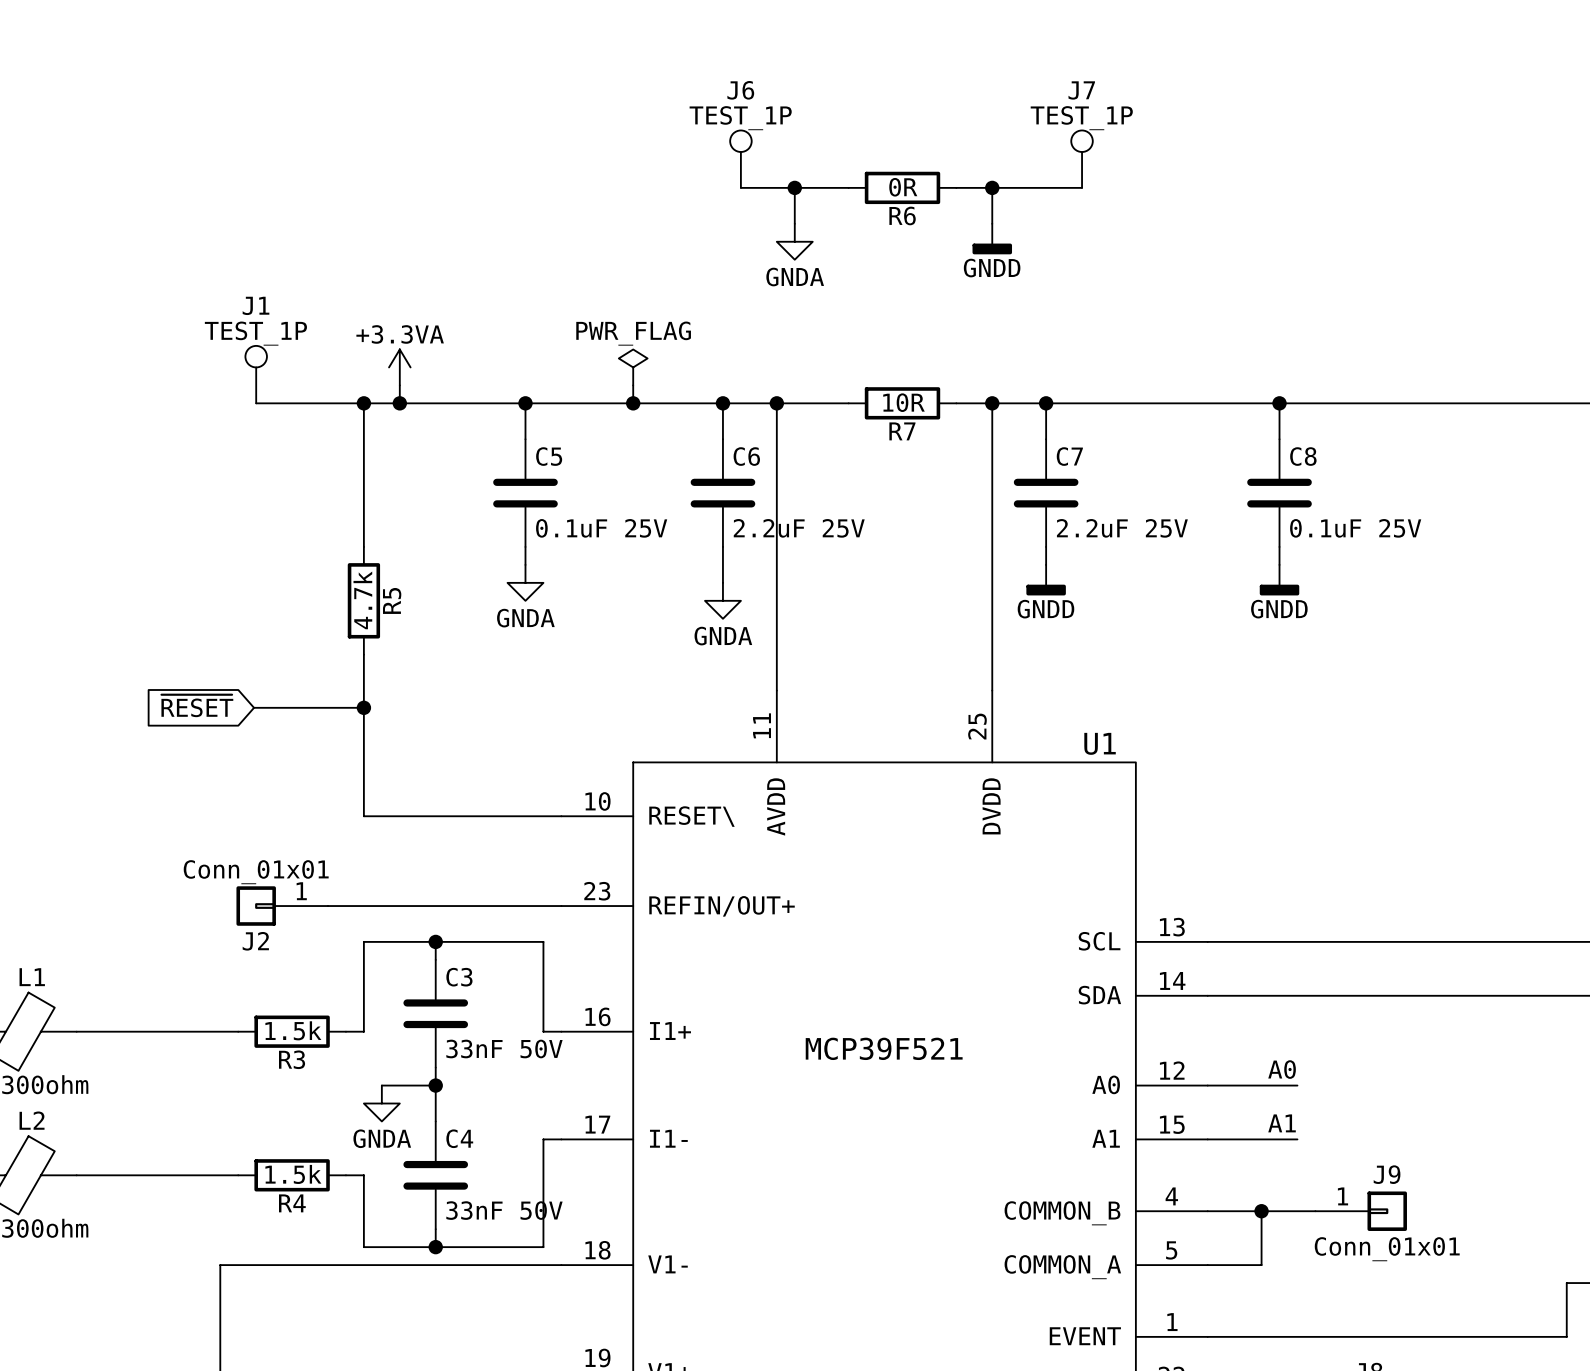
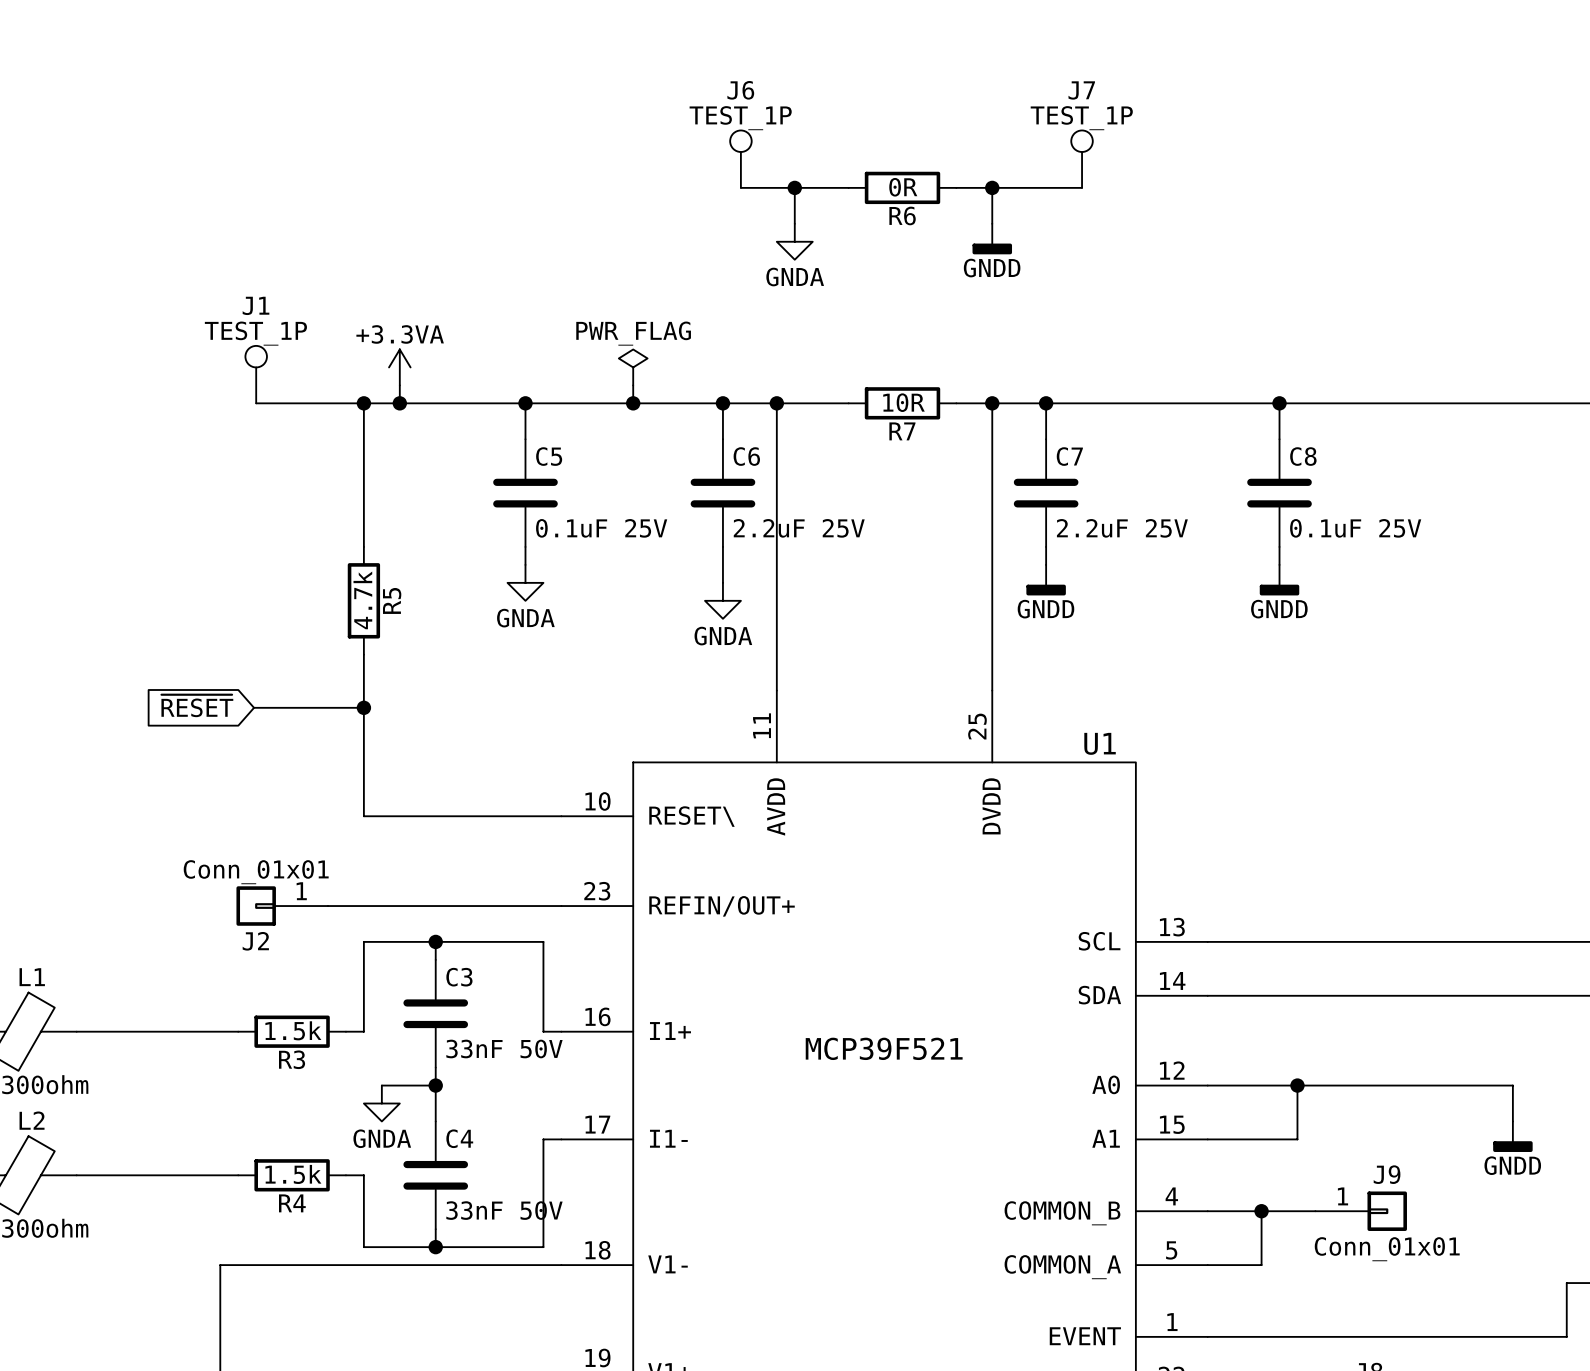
label: A0 (1282, 1069) -> none
junction: none -> (1297, 1085)
wire: none -> (1512, 1121) (1512, 1085) (1297, 1085) (1297, 1139)
label: A1 (1282, 1123) -> none
power symbol: none -> GNDD (1512, 1136)

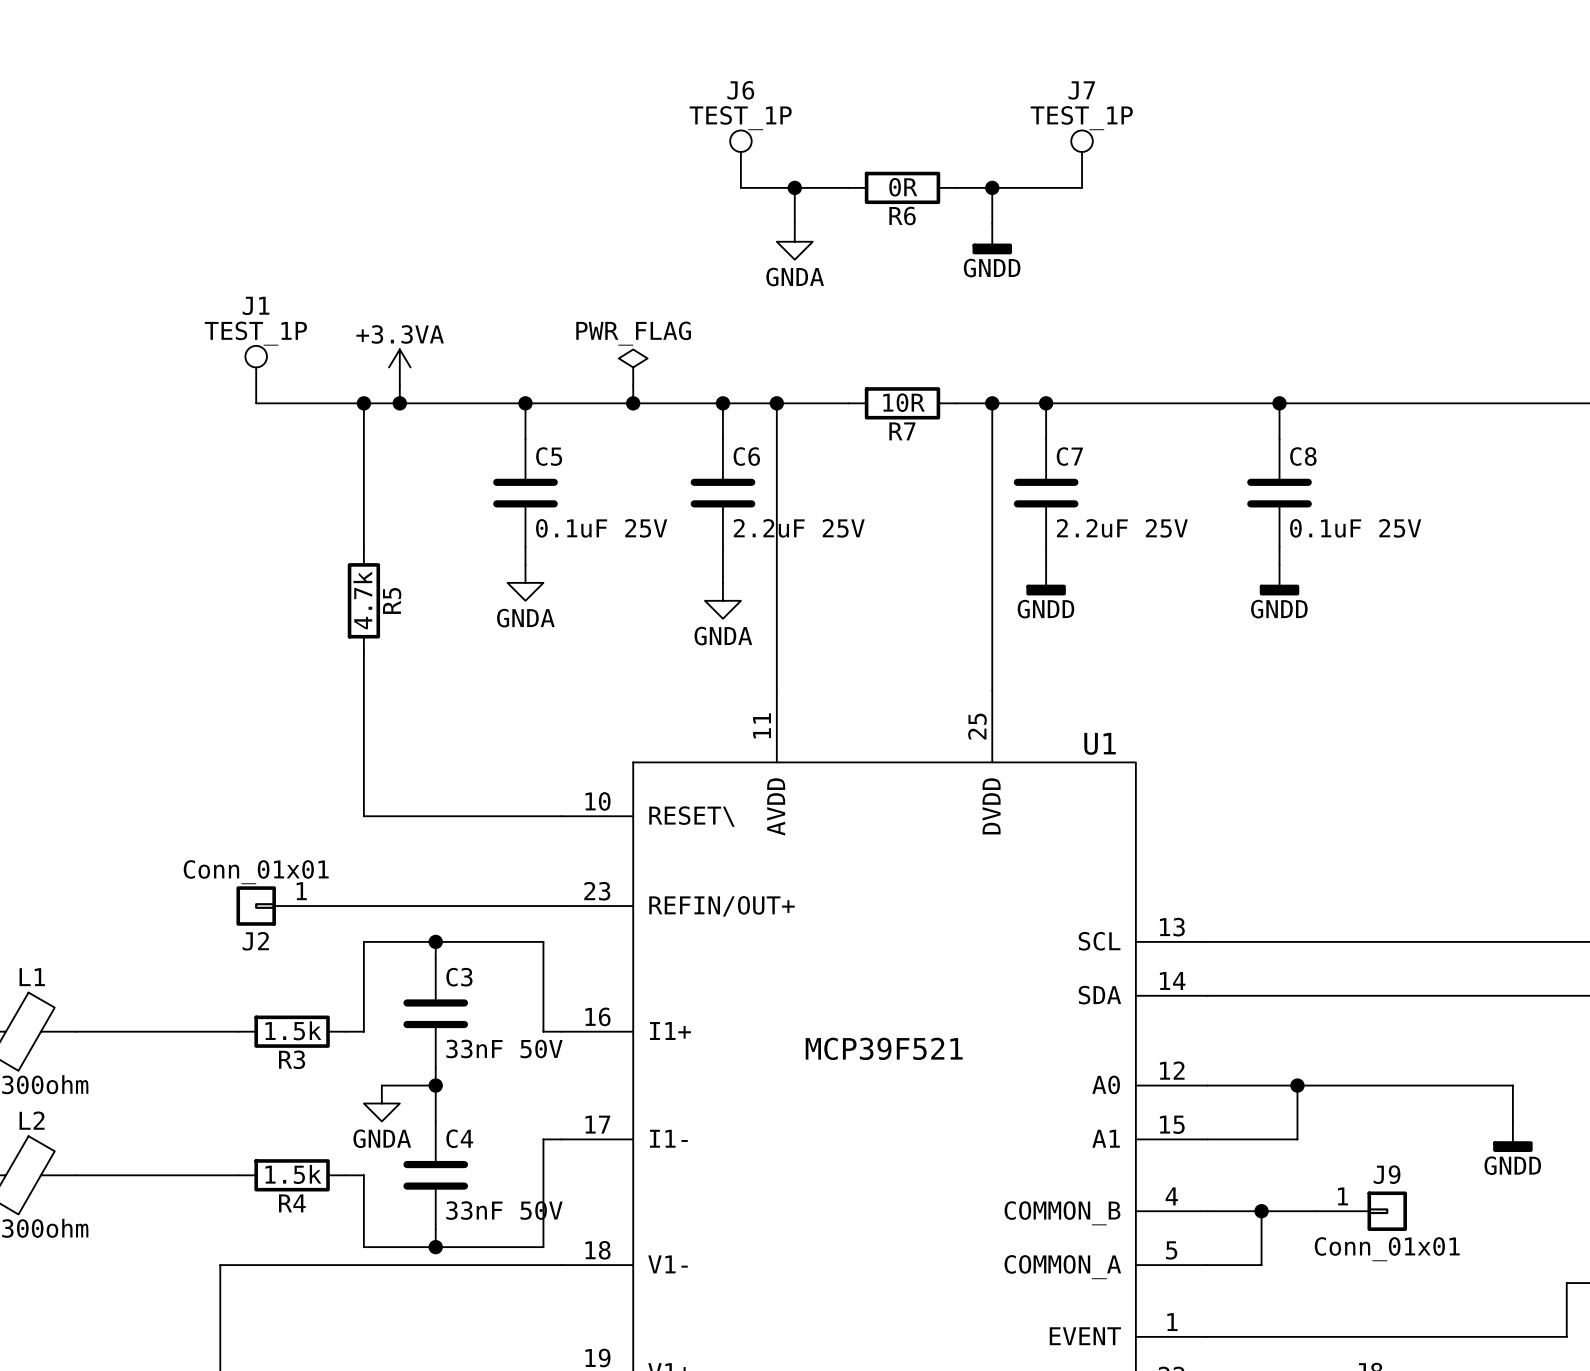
global label: ~{RESET} (197, 705) -> none
wire: (254, 707) (363, 707) -> none
junction: (363, 707) -> none

